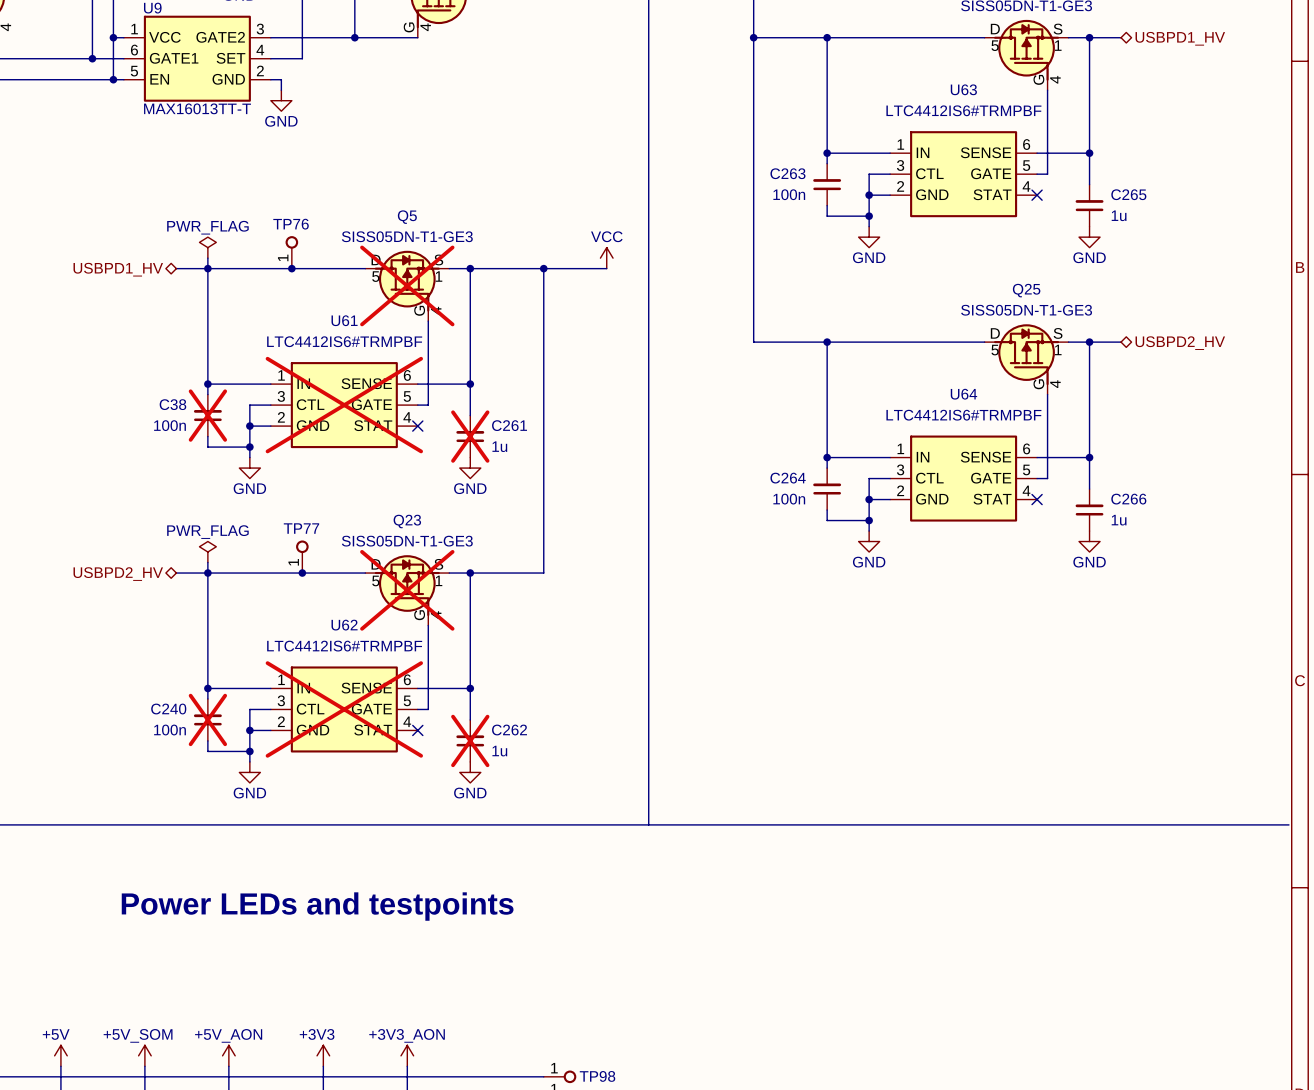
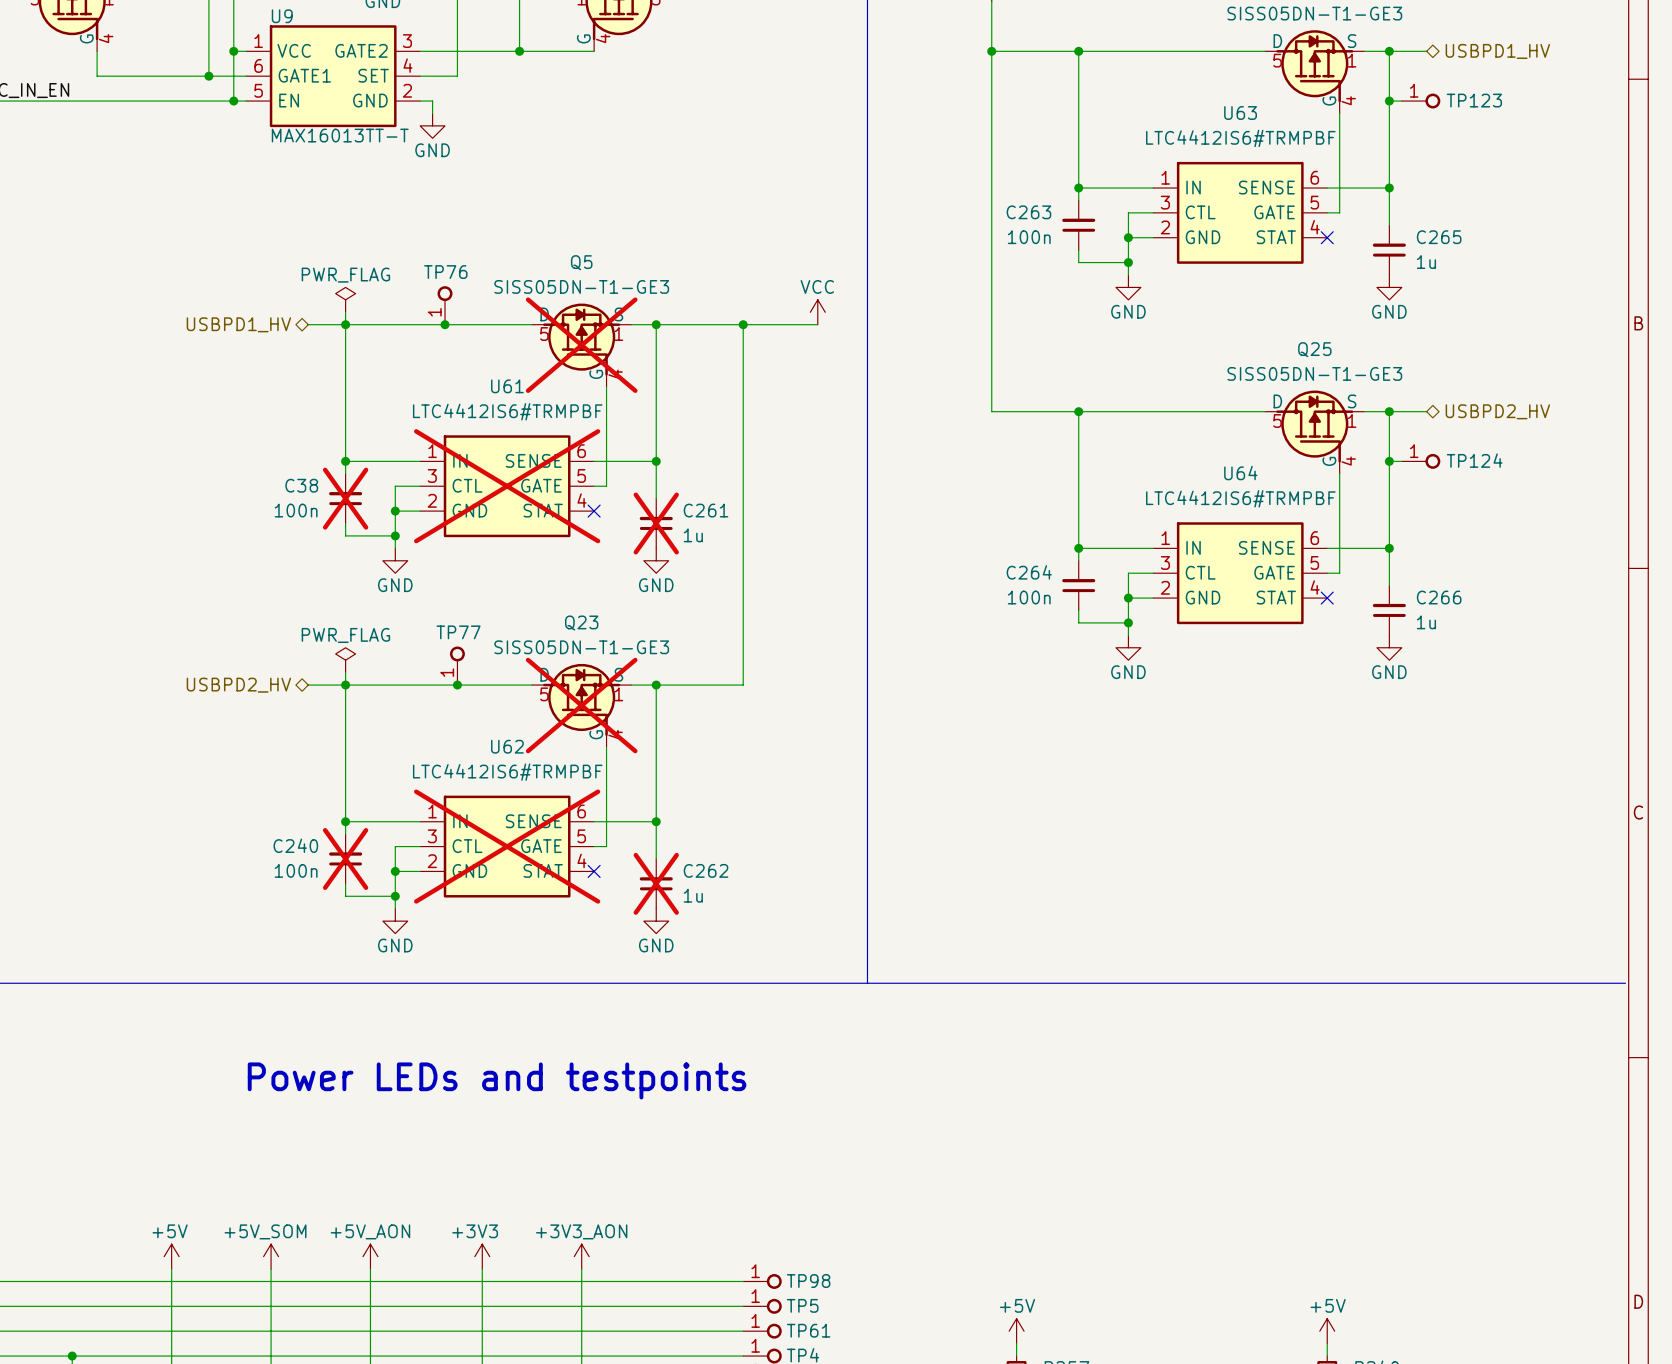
wire: none -> (1389, 101) (1401, 101)
junction: none -> (1389, 101)
TP123: none -> (1421, 101)
wire: none -> (1389, 461) (1401, 461)
junction: none -> (1389, 461)
TP124: none -> (1421, 461)

